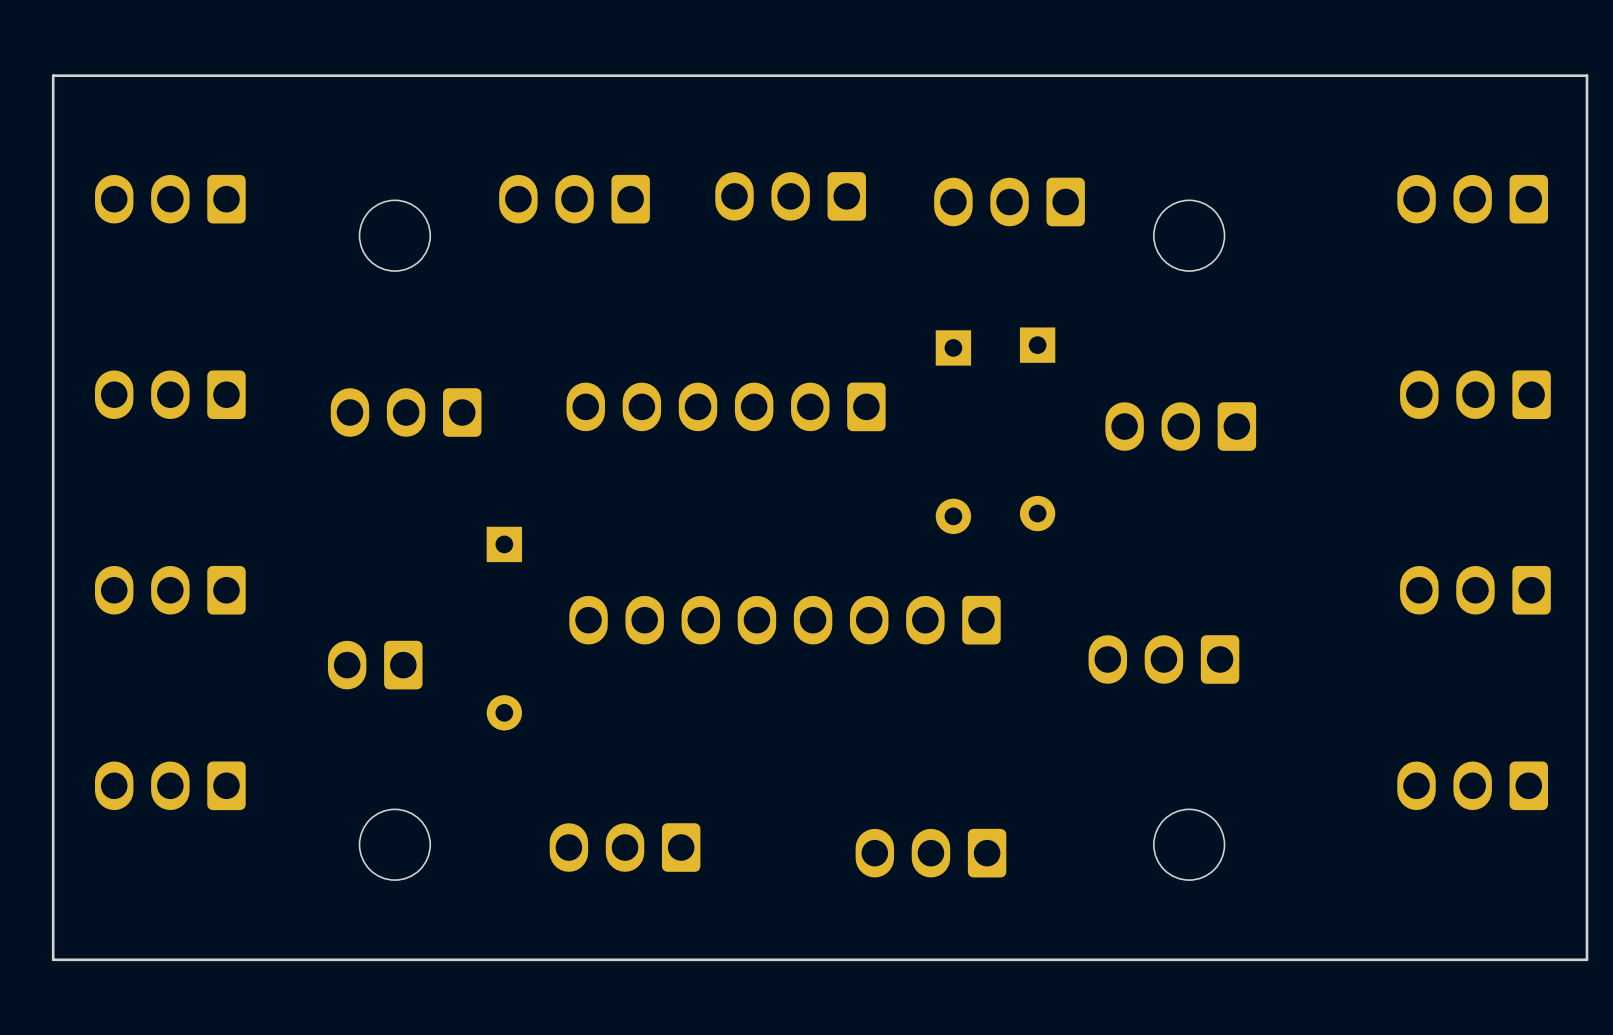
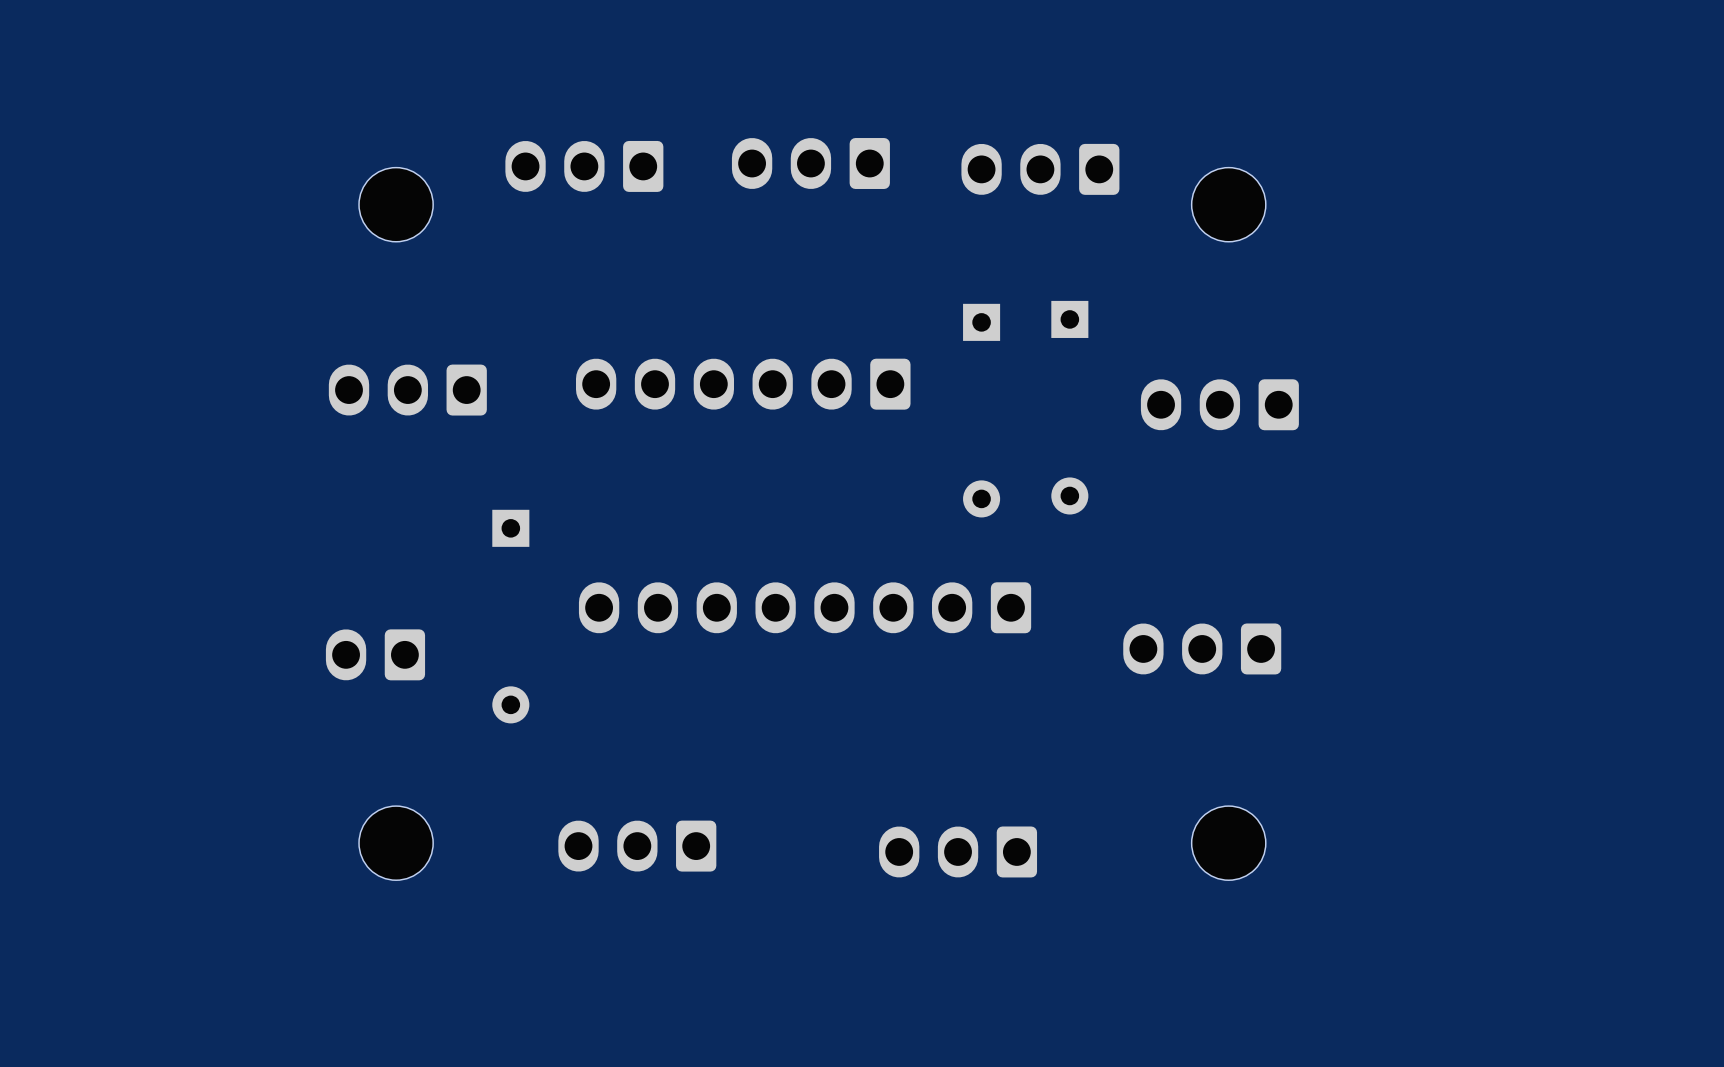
board edge: (1586, 75) (1586, 959) (53, 959) (53, 75) (1586, 75) -> none
part: (170, 199) -> none
part: (1472, 199) -> none
part: (170, 394) -> none
part: (1475, 394) -> none
part: (170, 590) -> none
part: (1475, 590) -> none
part: (170, 785) -> none
part: (1472, 785) -> none

